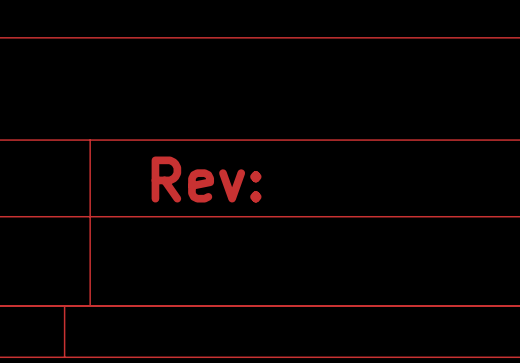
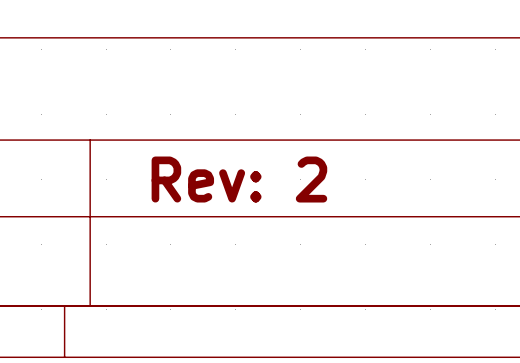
title block: Rev: (206, 179) -> Rev: 2 (239, 179)

